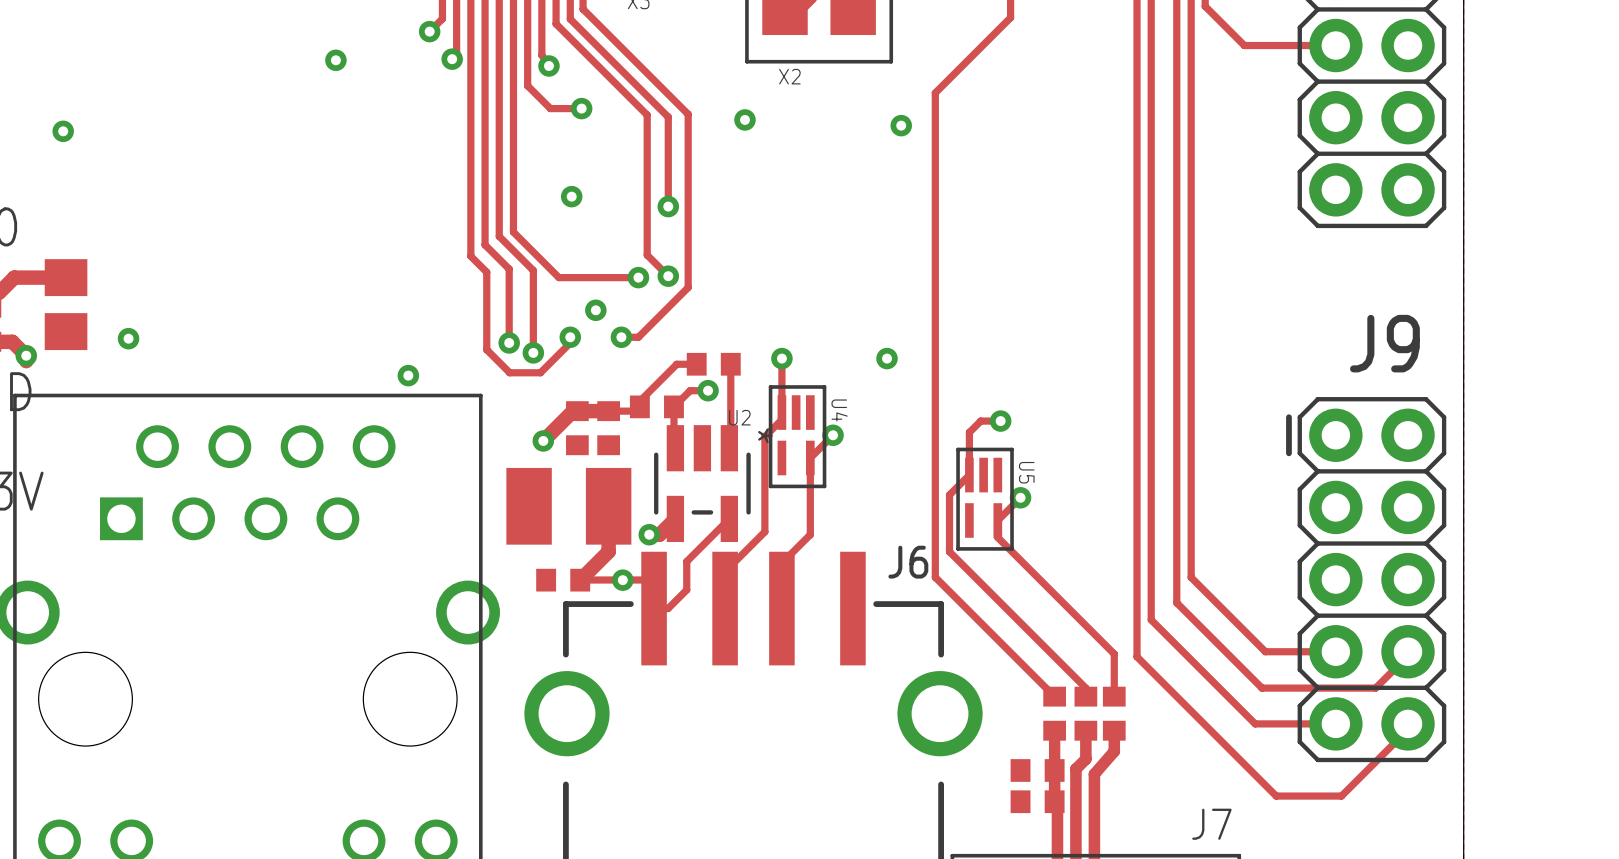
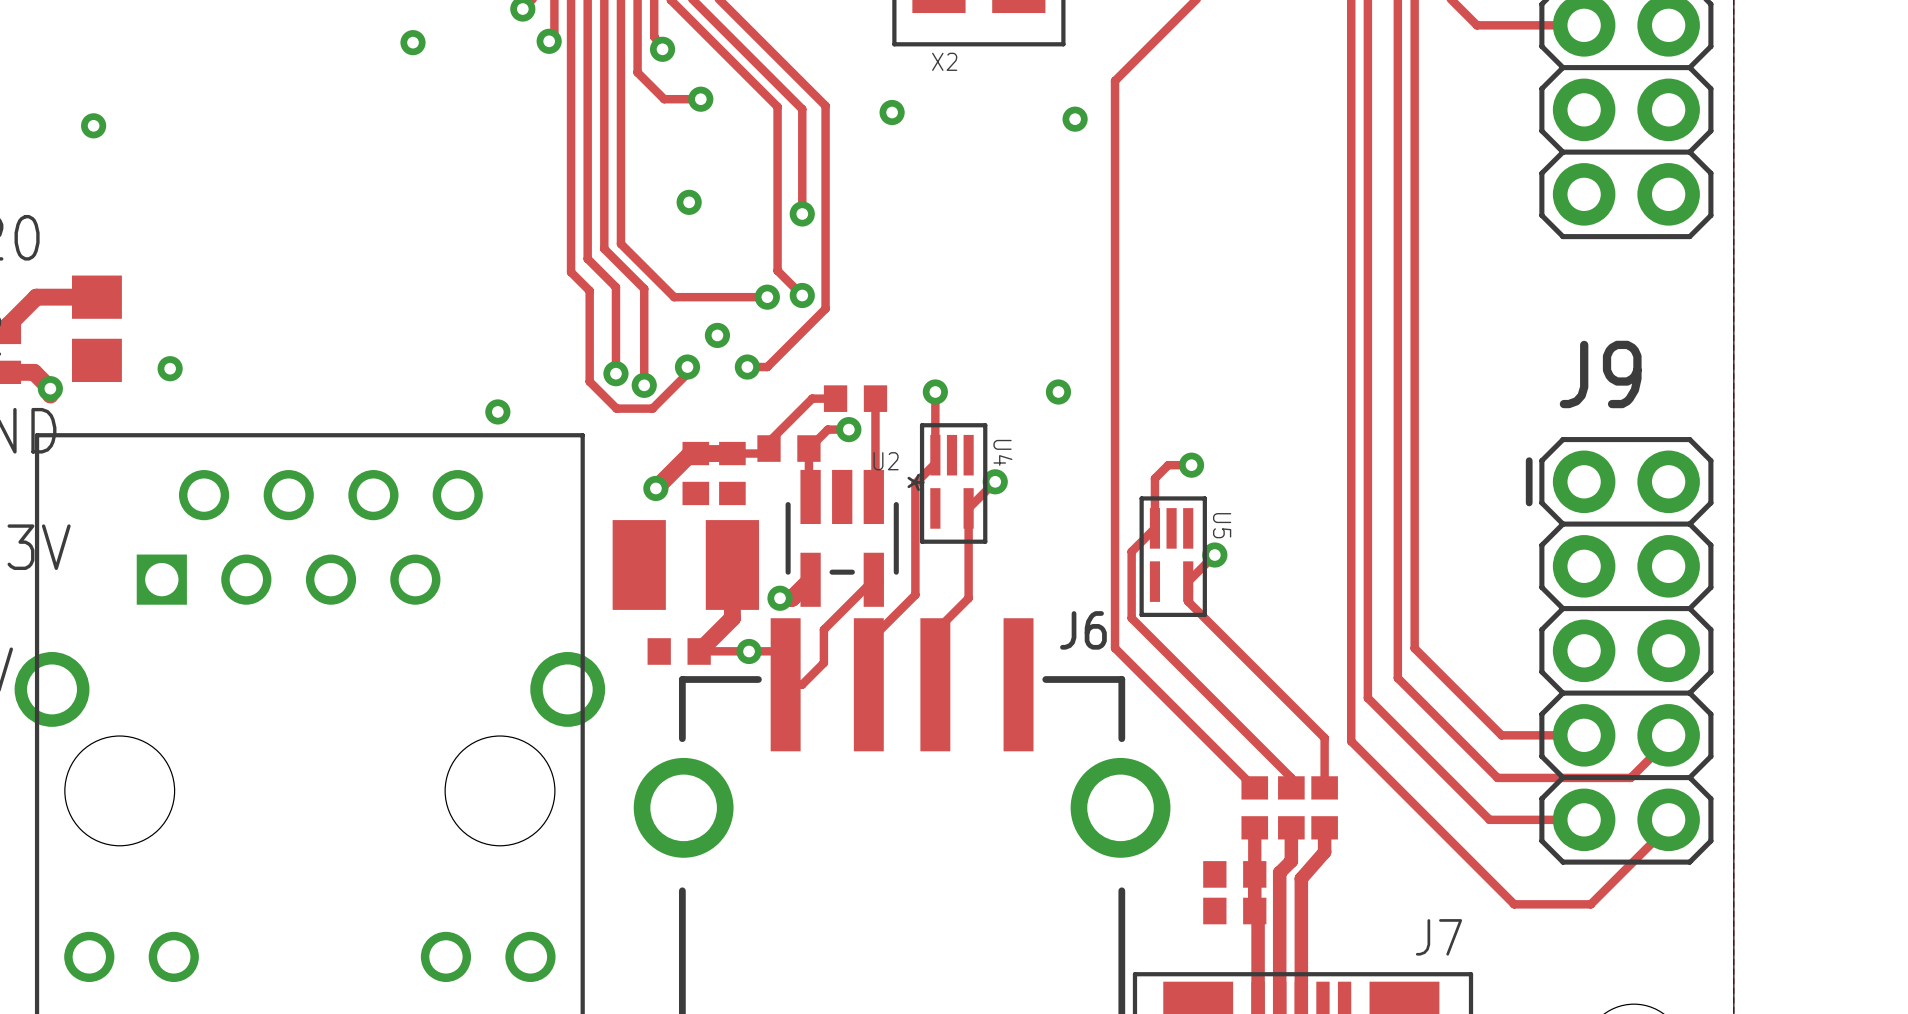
J9 name position: J9 (1384, 343) -> J9 (1600, 374)

